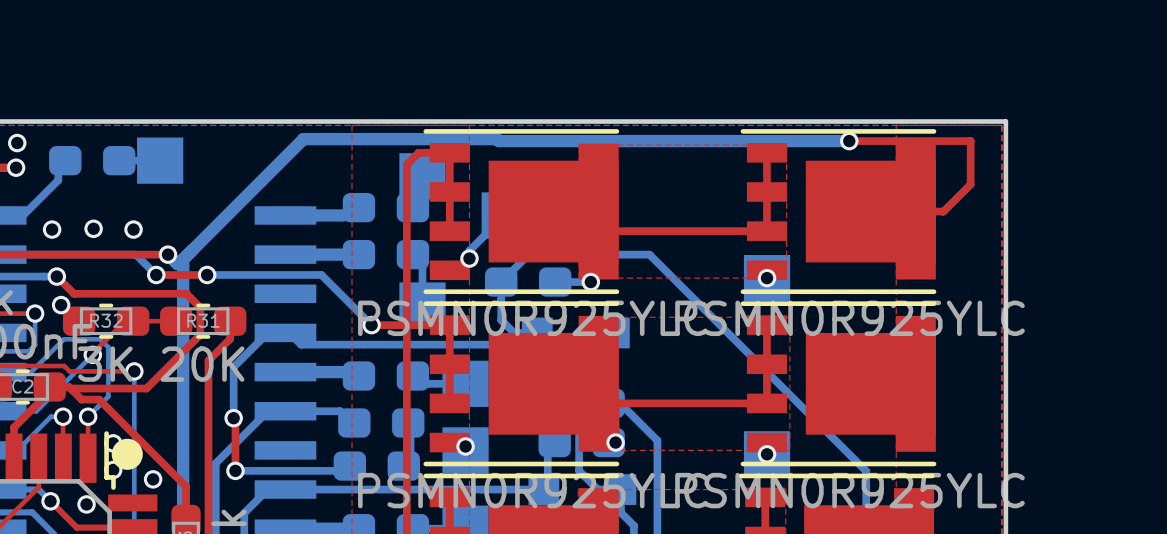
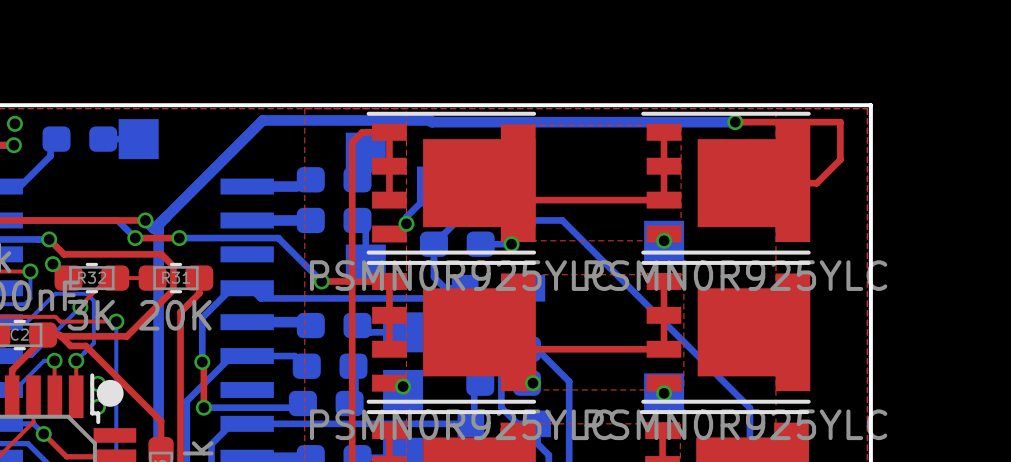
via: (93, 228) -> none
via: (52, 229) -> none
via: (133, 229) -> none
via: (153, 479) -> none
via: (86, 504) -> none

